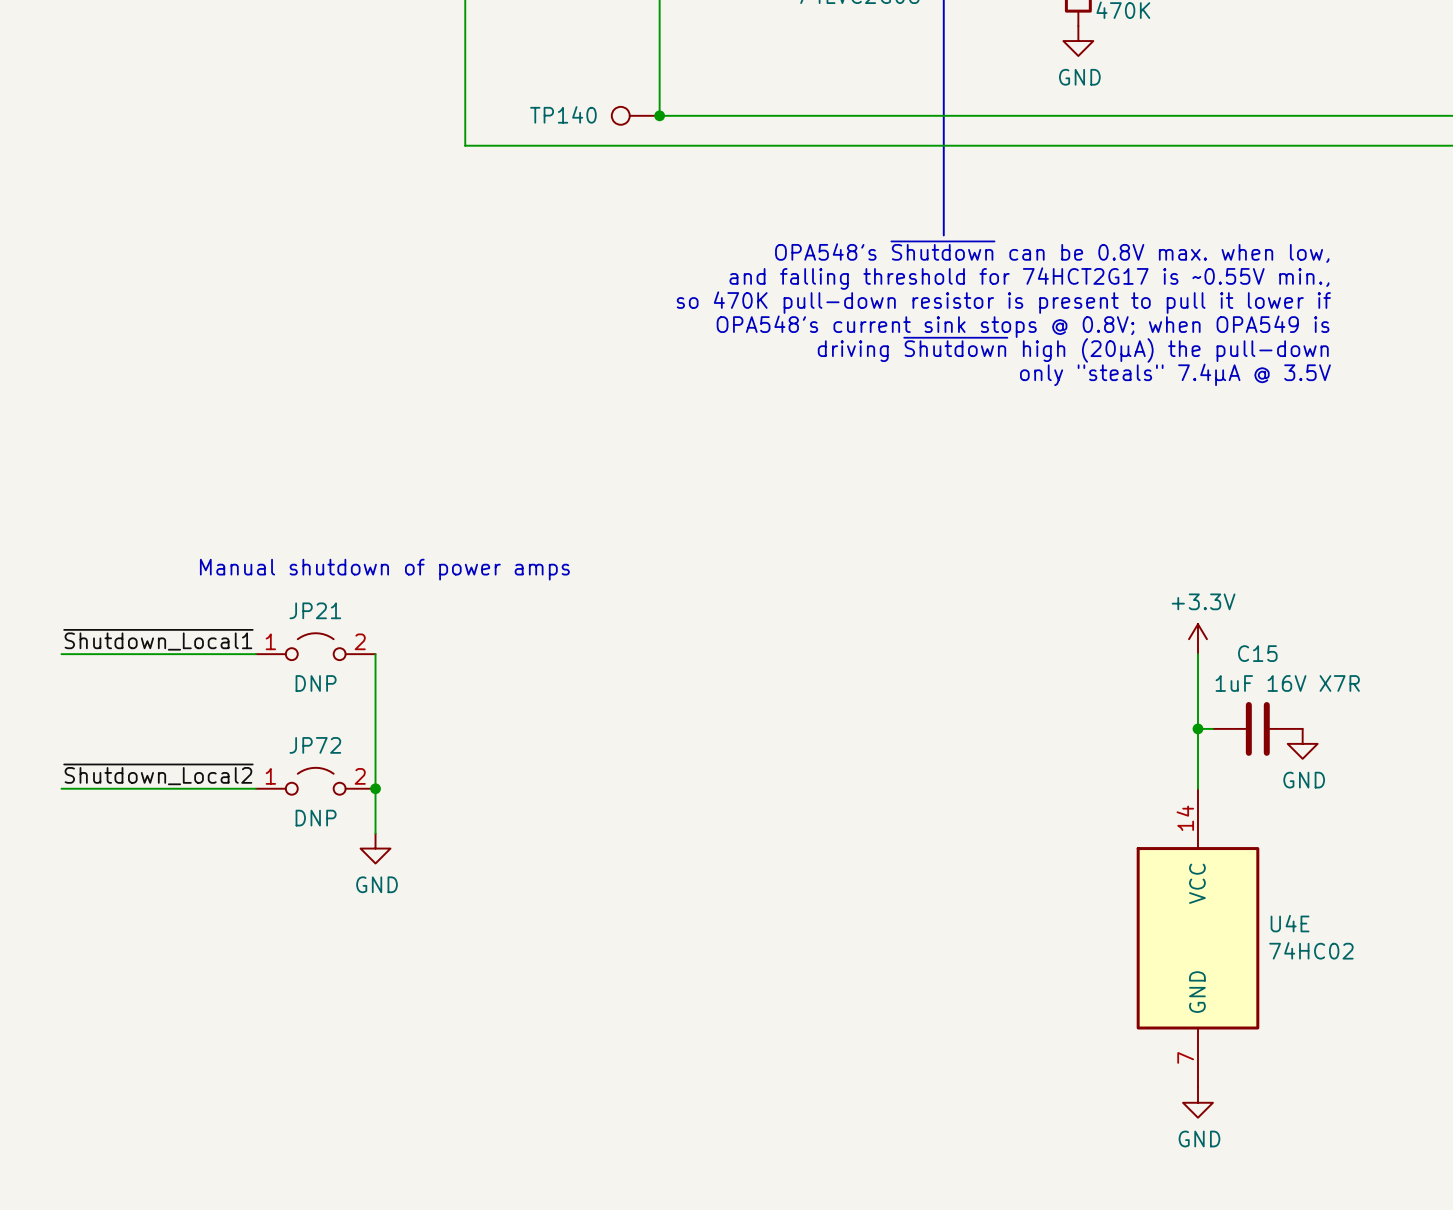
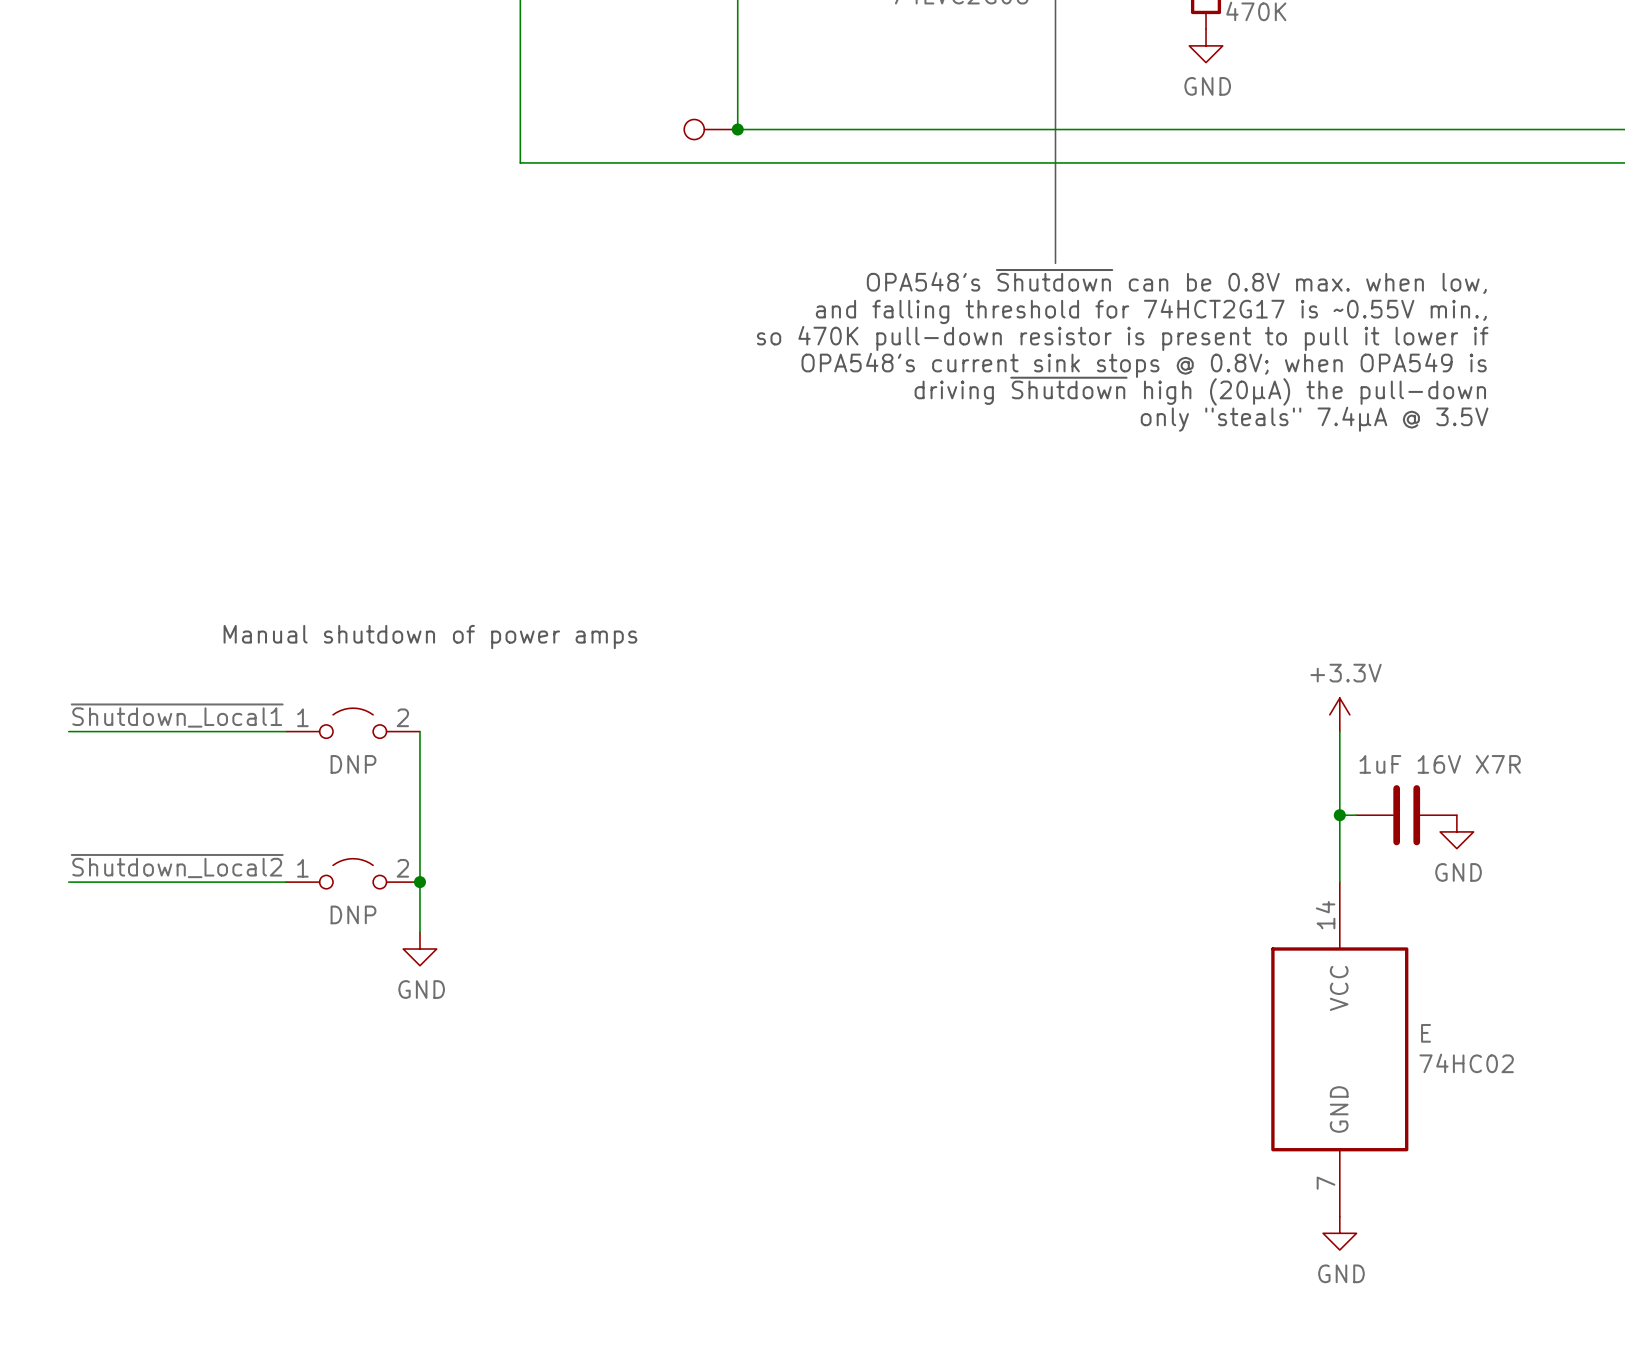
TP140 name: TP140 (563, 114) -> none
JP21 name: JP21 (315, 610) -> none
C15 name: C15 (1257, 653) -> none
JP72 name: JP72 (315, 745) -> none
U4E name: U4E (1290, 923) -> E (1426, 1033)

